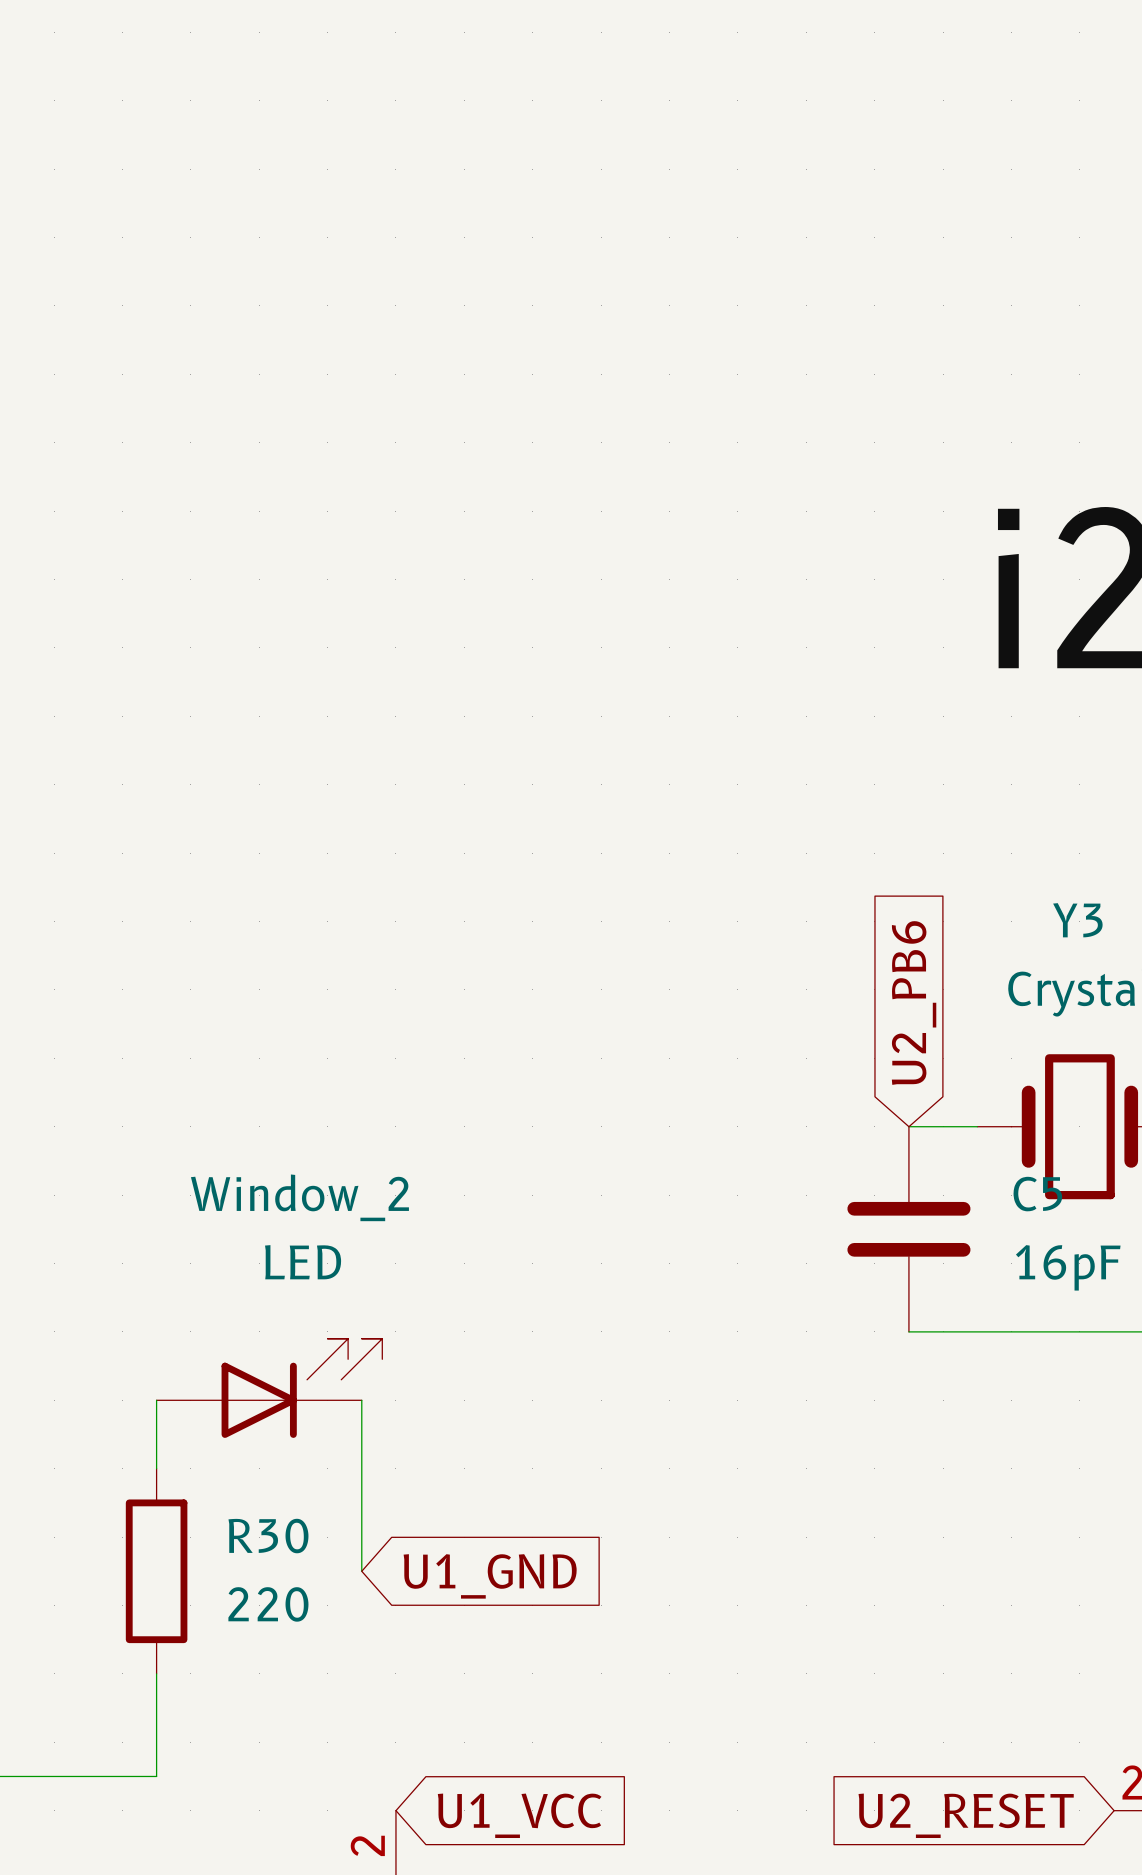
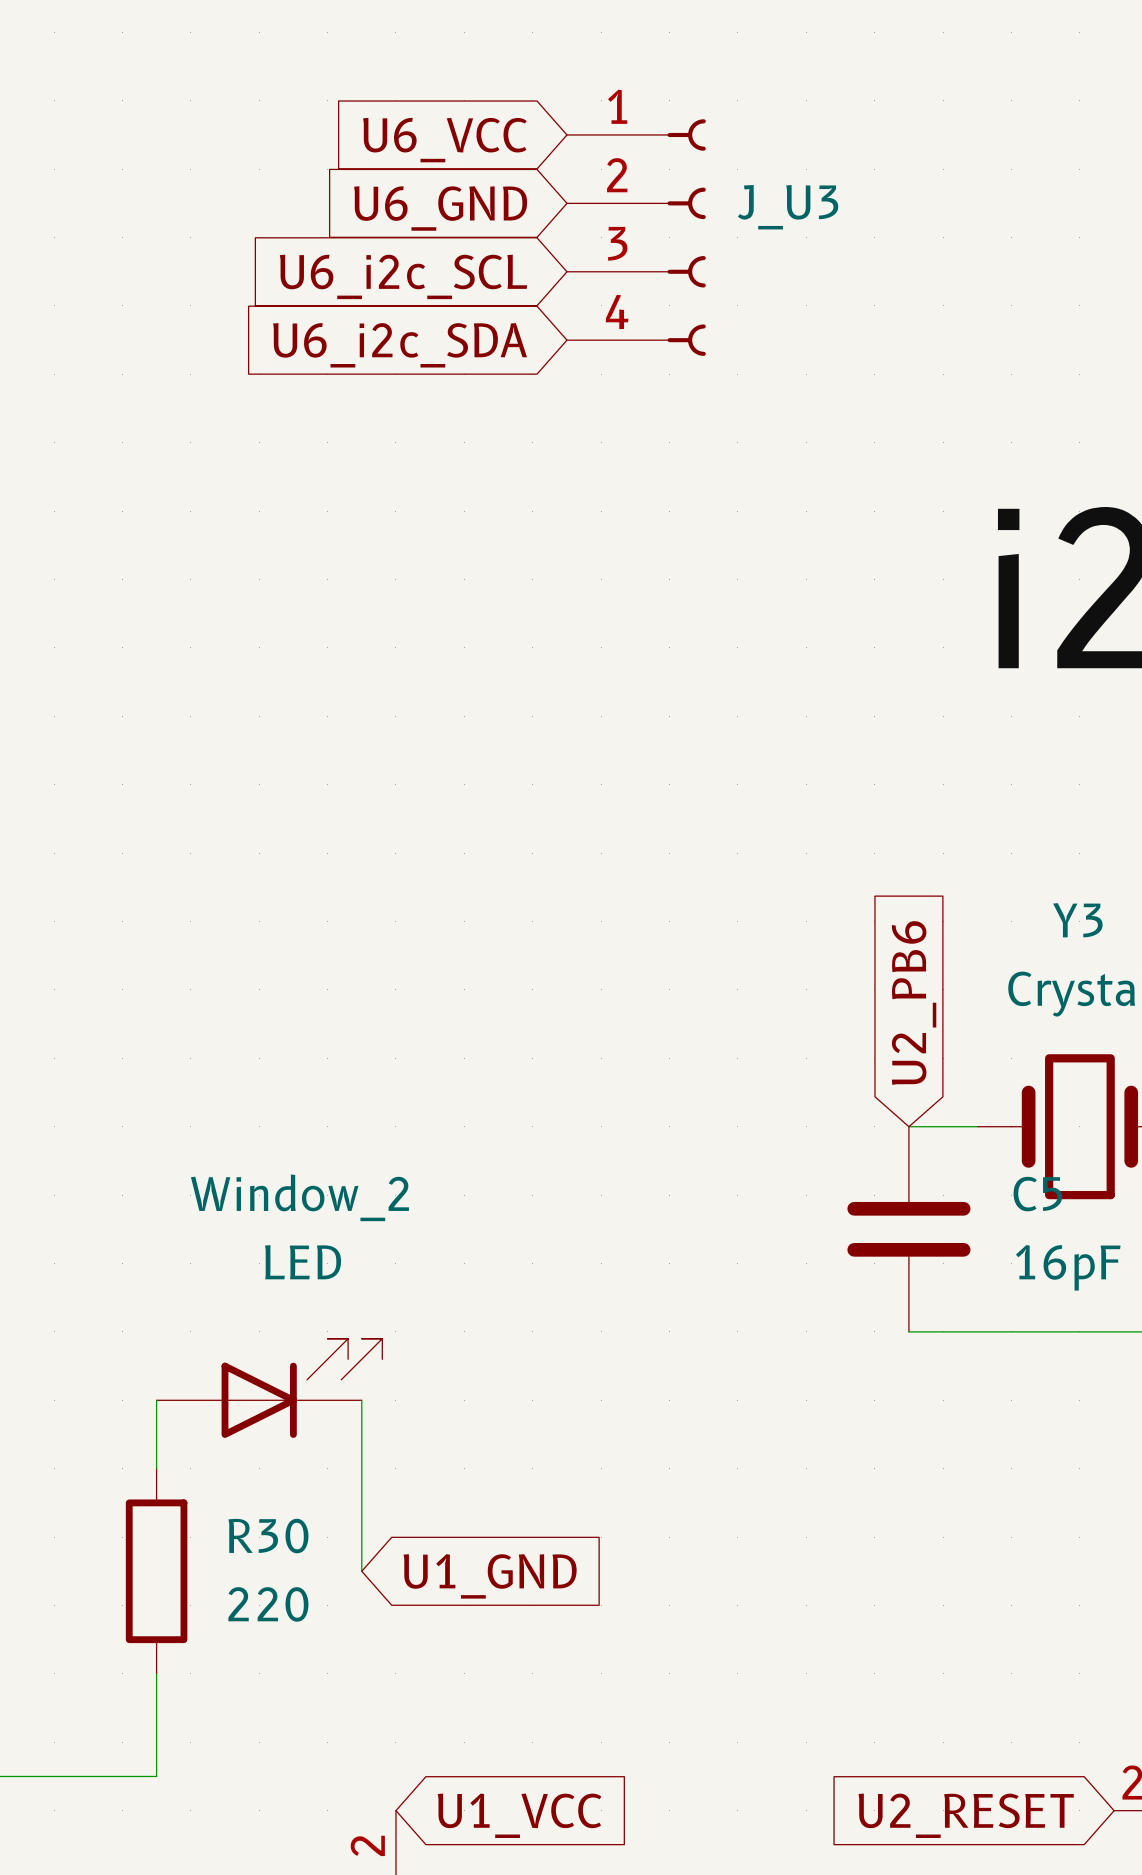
global label: none -> U6_VCC (444, 140)
global label: none -> U6_GND (440, 208)
J_U3: none -> (636, 237)
global label: none -> U6_i2c_SCL (403, 276)
global label: none -> U6_i2c_SDA (400, 345)

